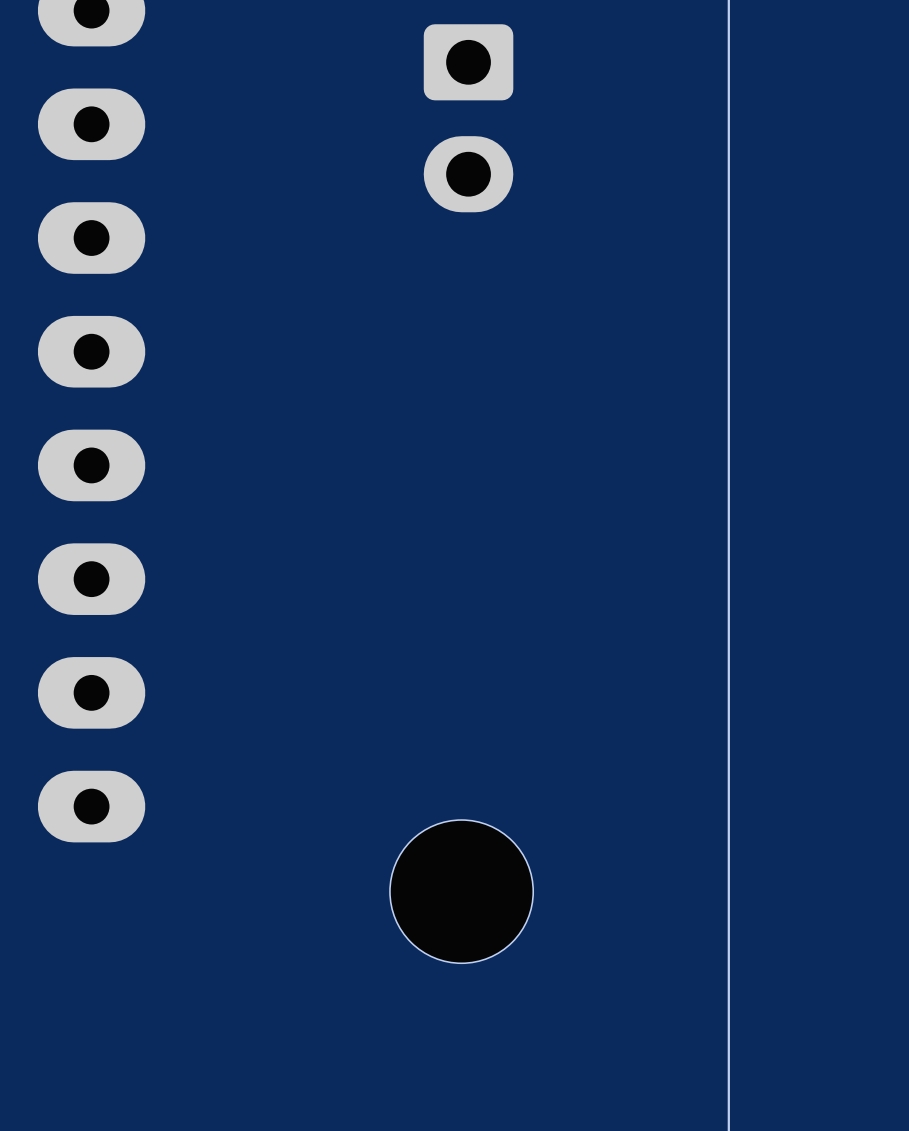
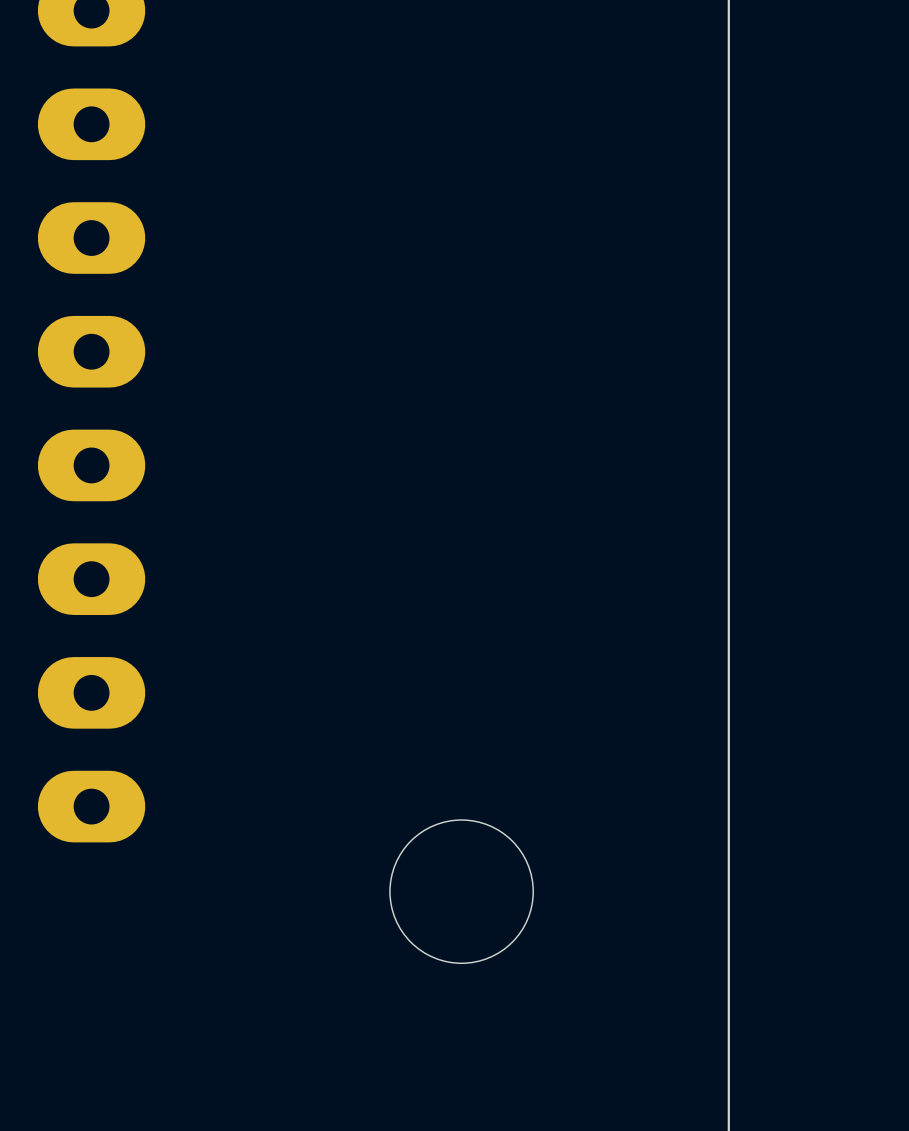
part: (468, 118) -> none

